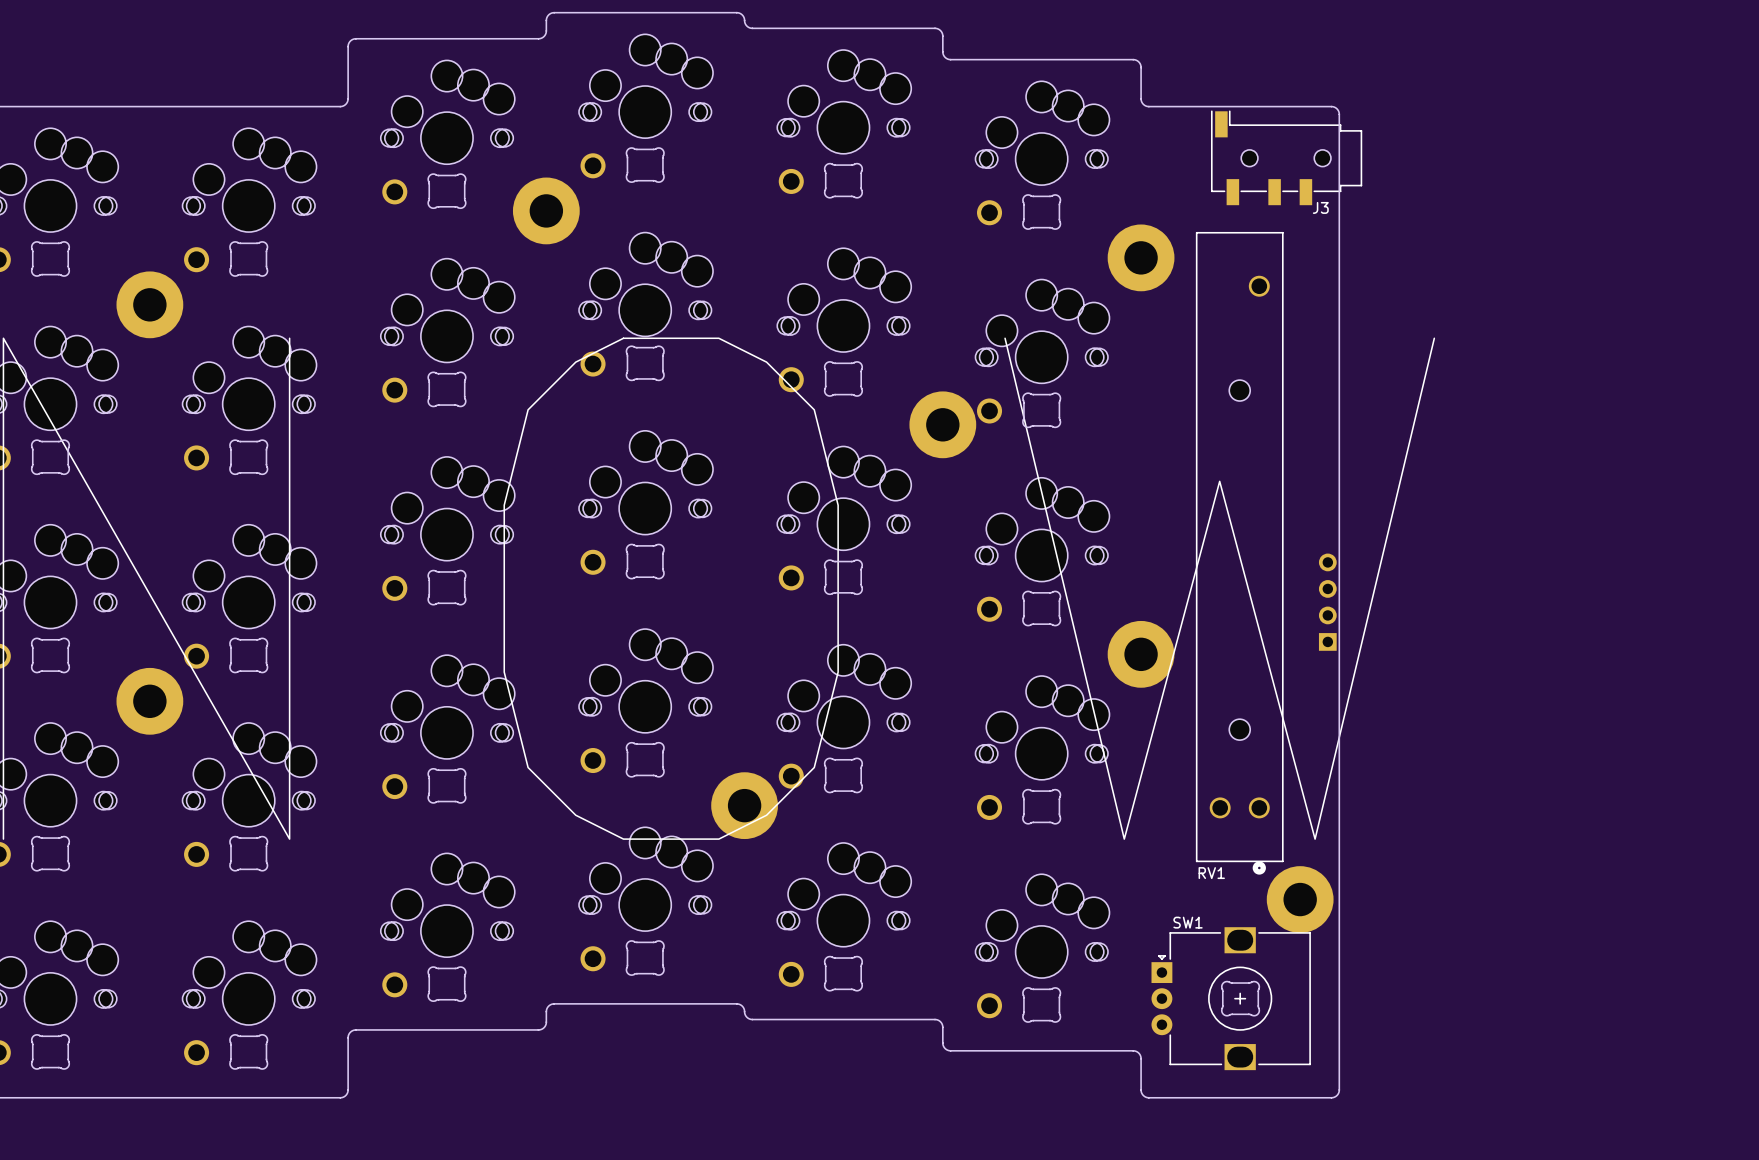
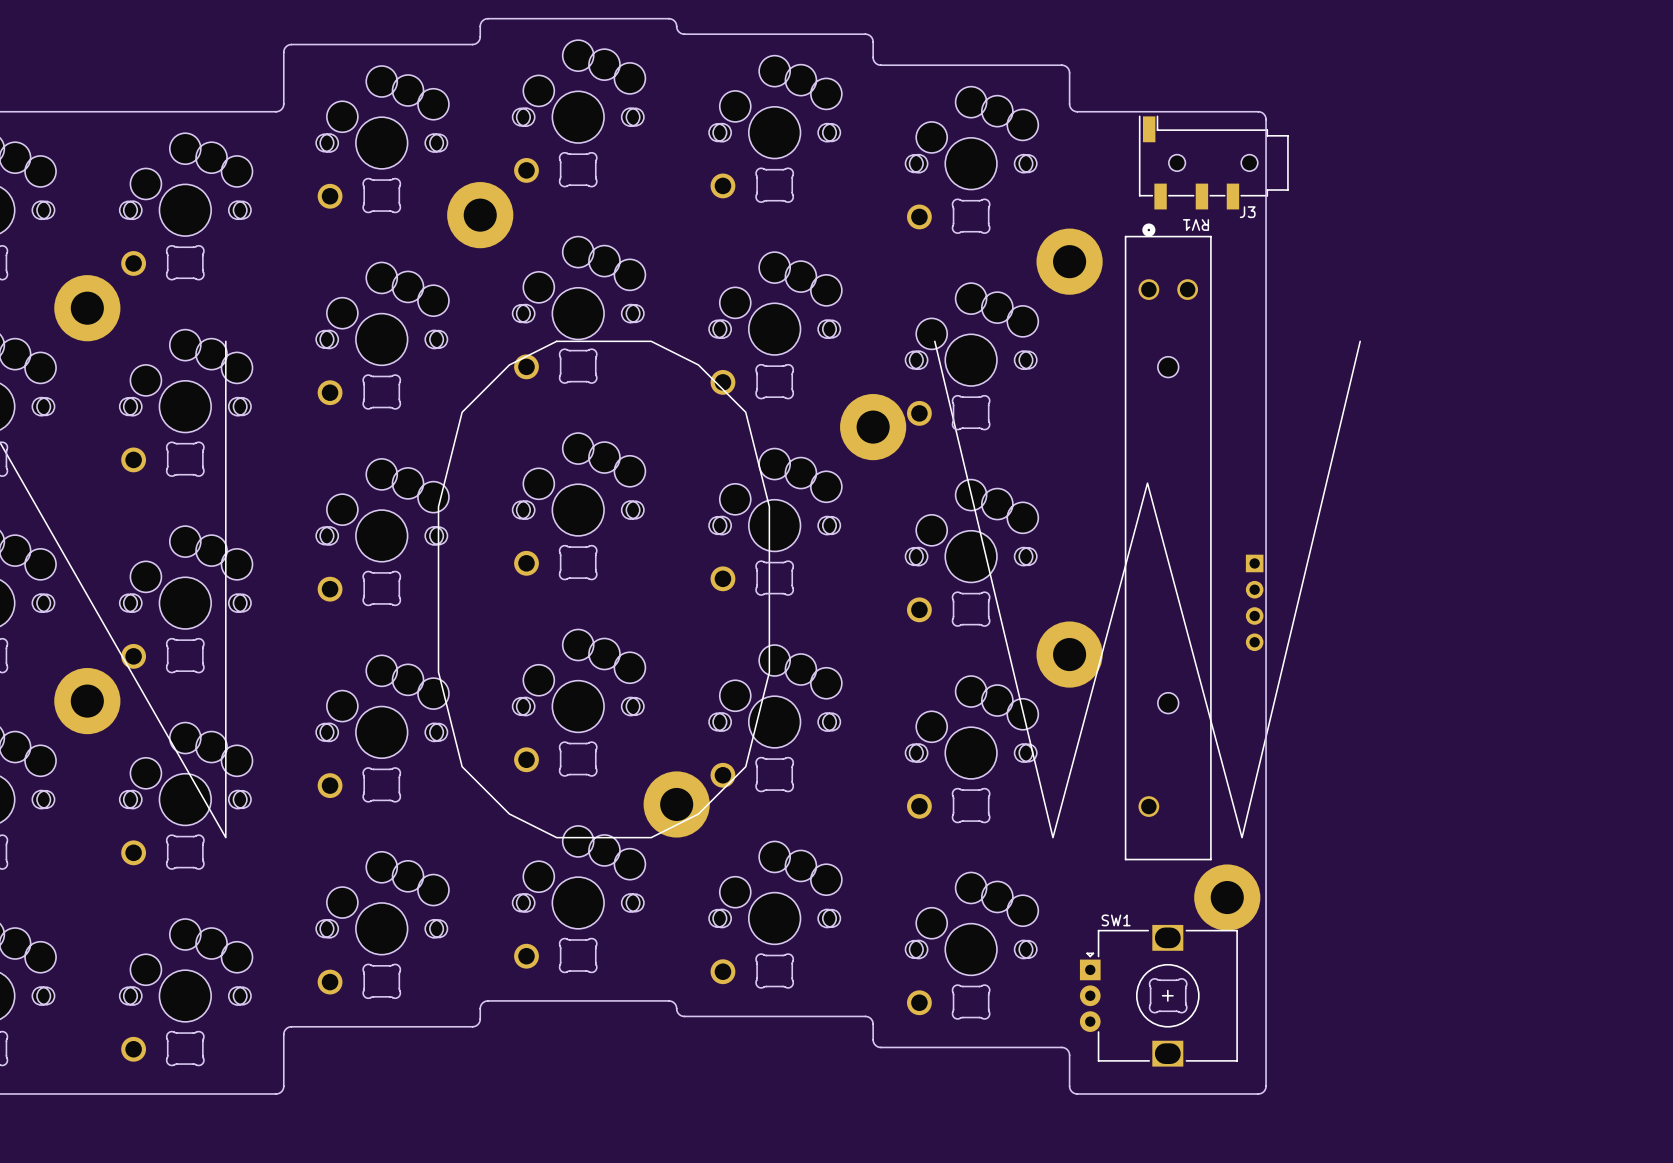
RV1 rotation: 0° (1239, 553) -> 180° (1168, 541)
part rotation: 0° (1327, 602) -> 180° (1254, 602)

